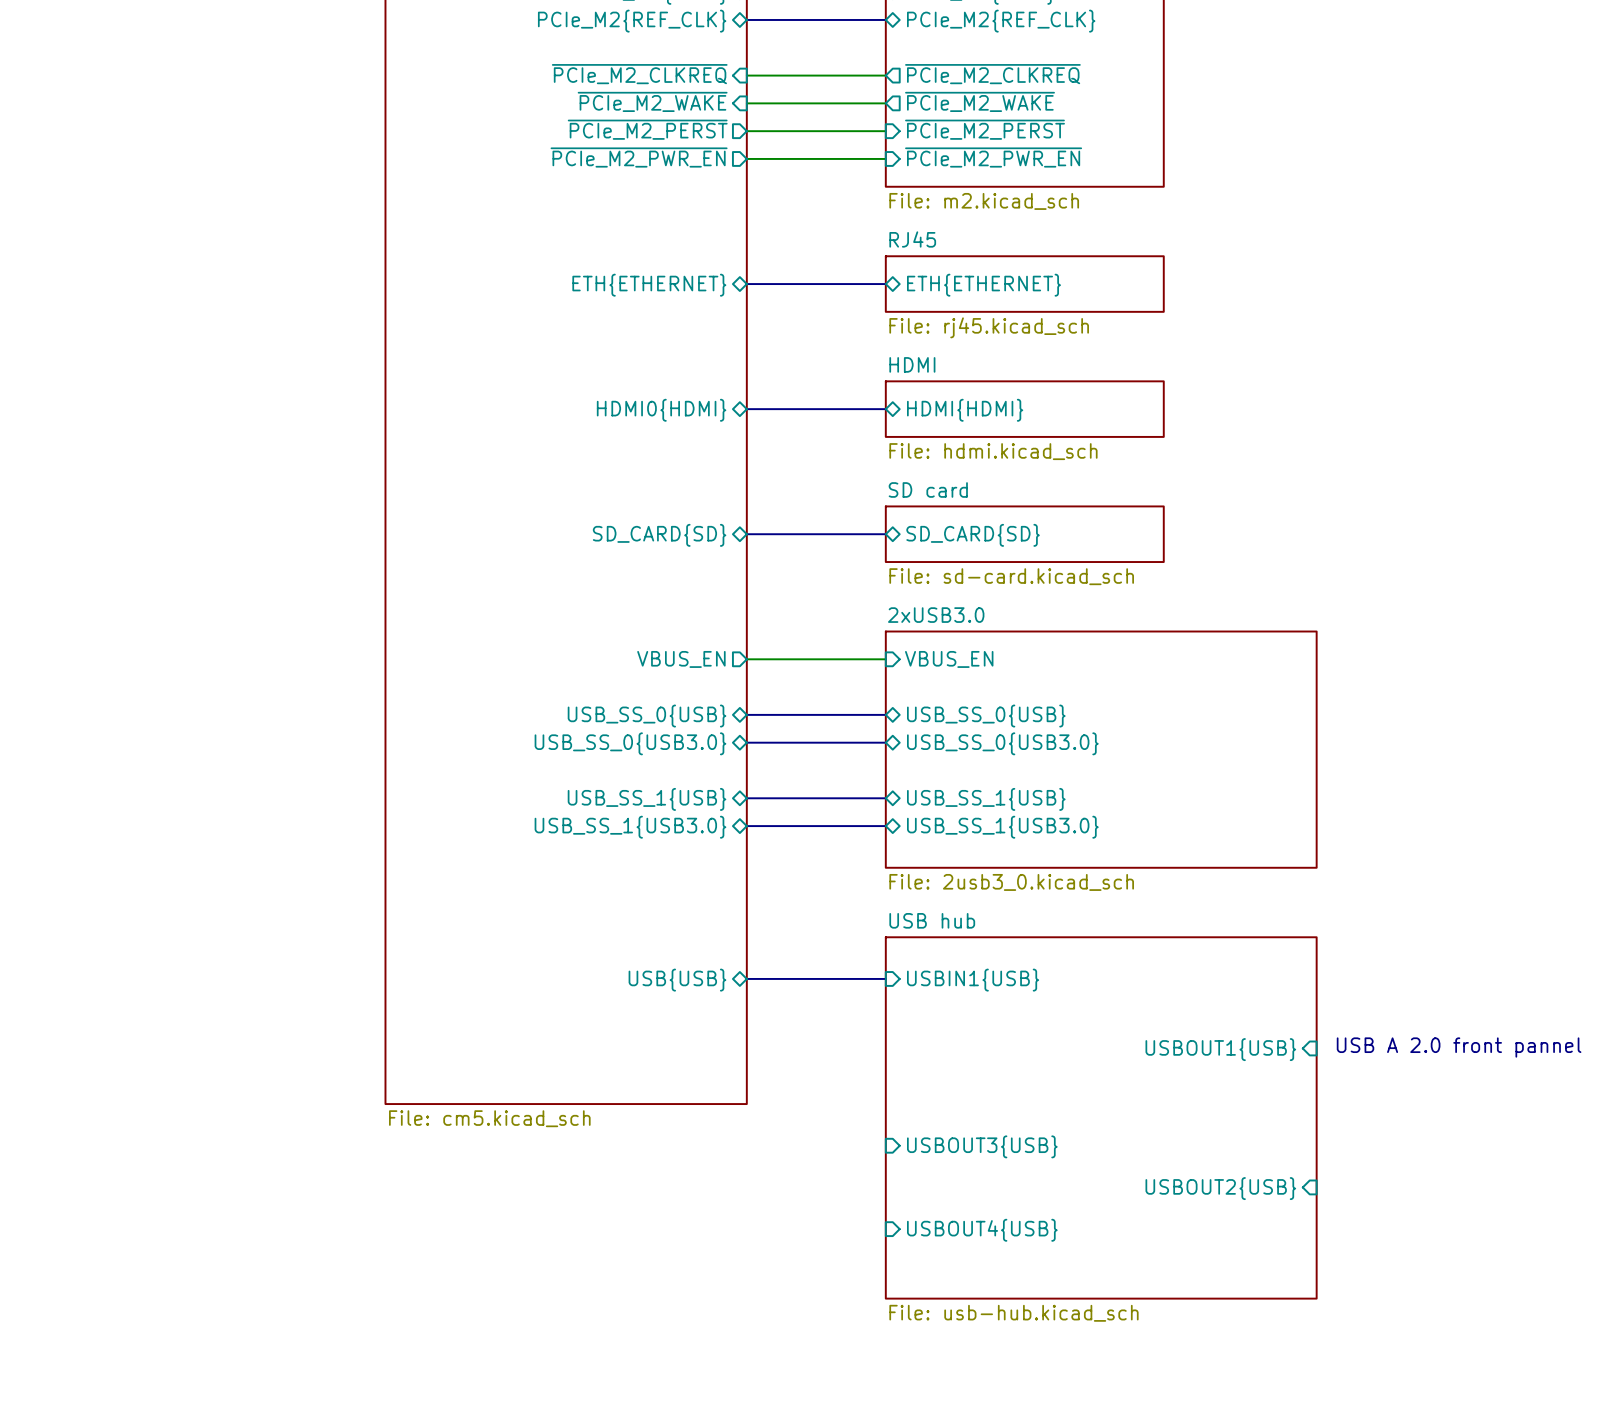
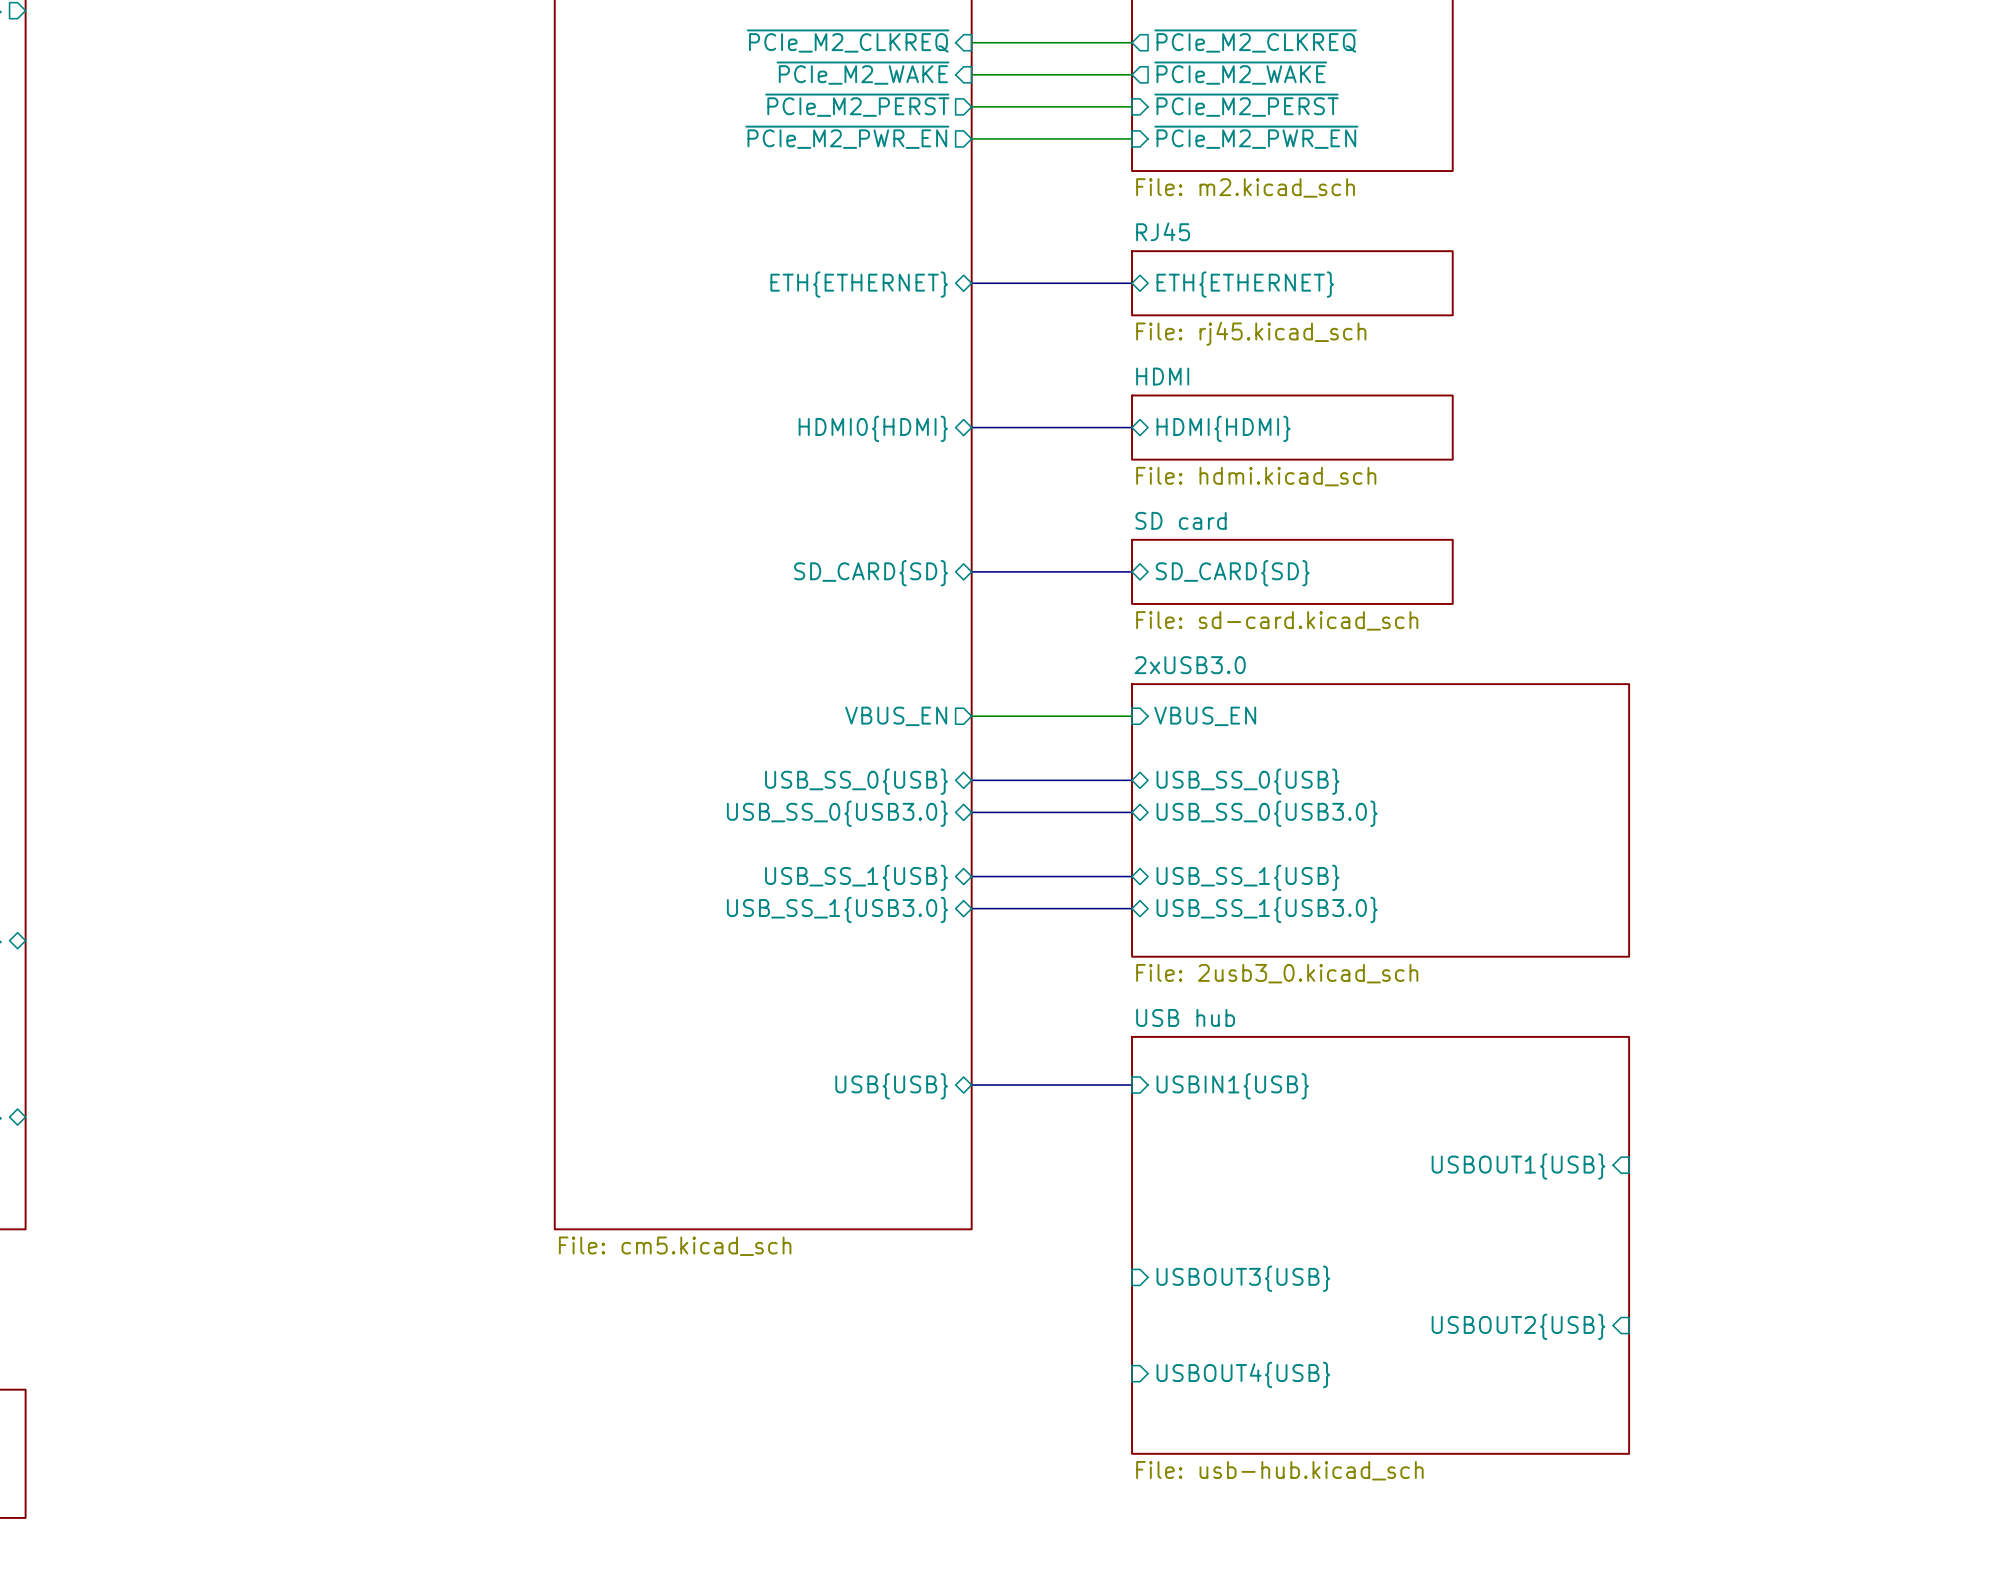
text: USB A 2.0 front pannel (1459, 1047) -> none

